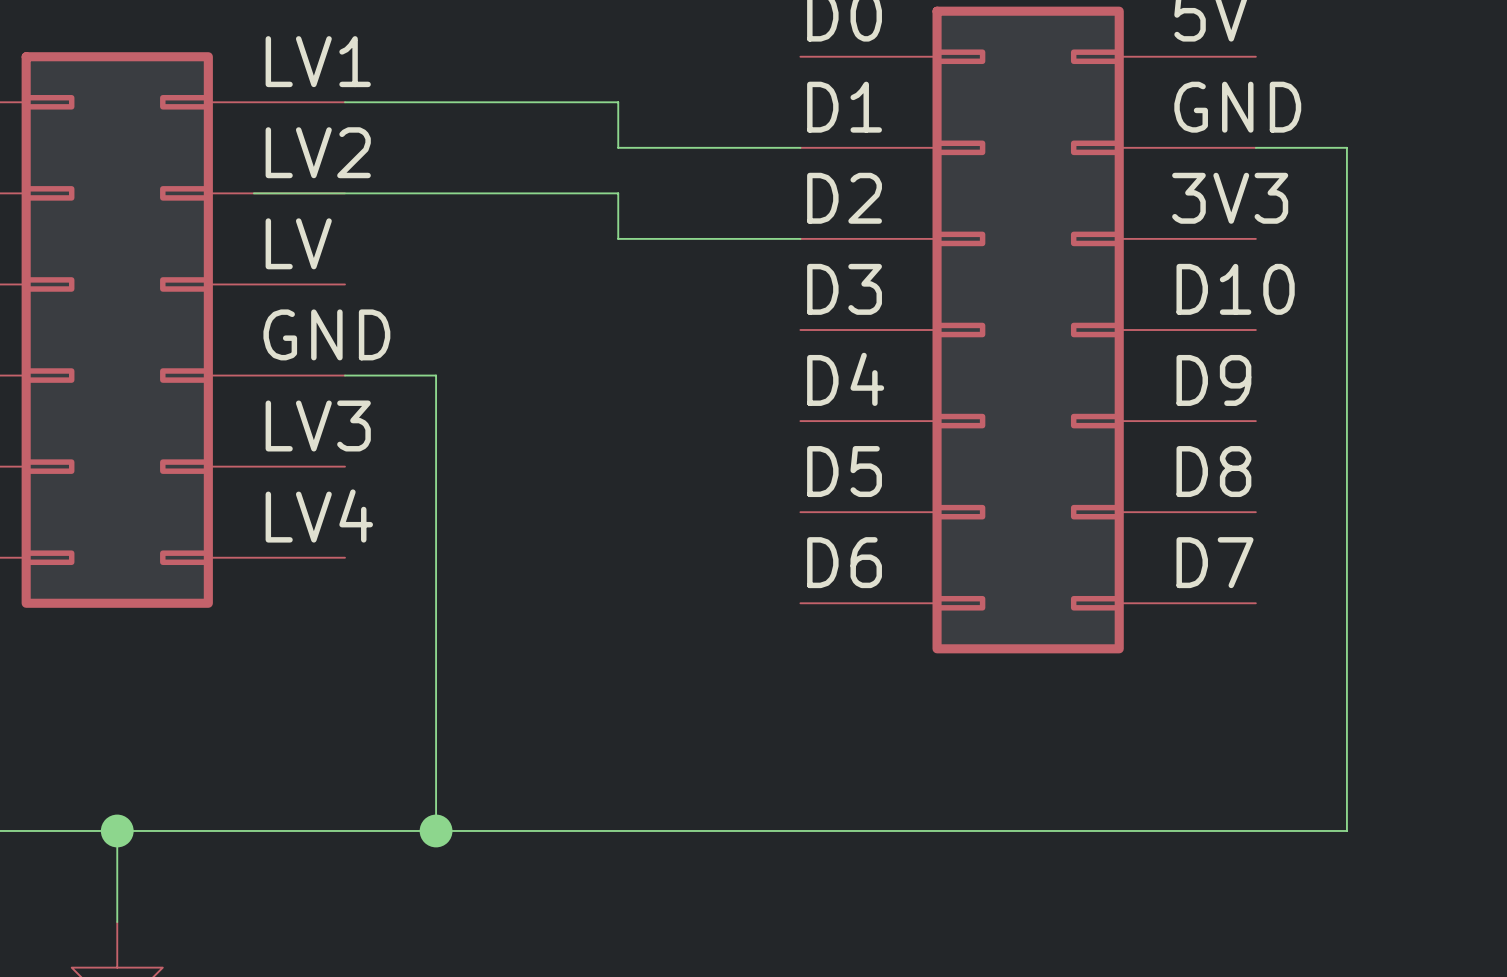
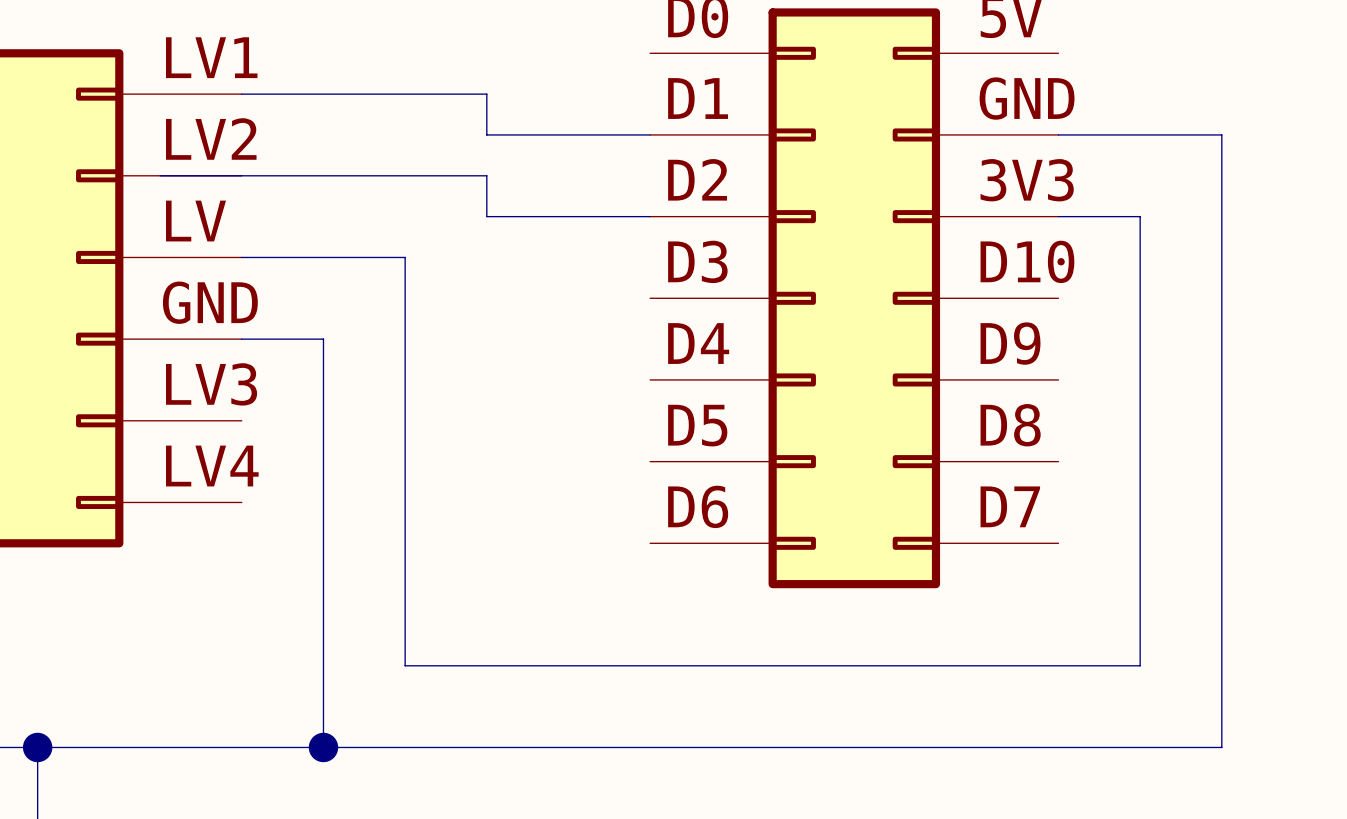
wire: (1346, 147) (1346, 238) -> (1058, 216) (1140, 216)
wire: none -> (241, 257) (405, 257) (405, 665) (1140, 665)
wire: (1346, 739) (1346, 830) -> (1140, 134) (1221, 134) (1221, 747) (1140, 747)

